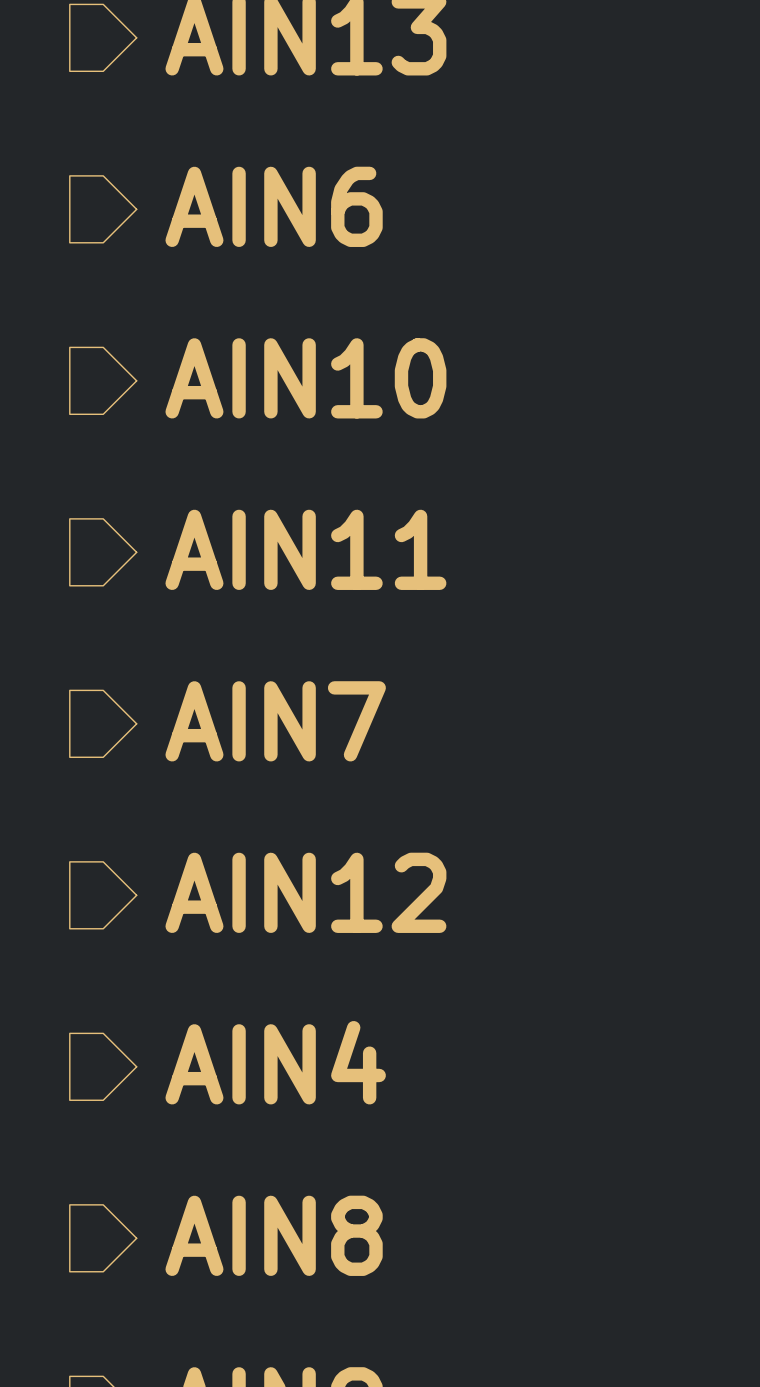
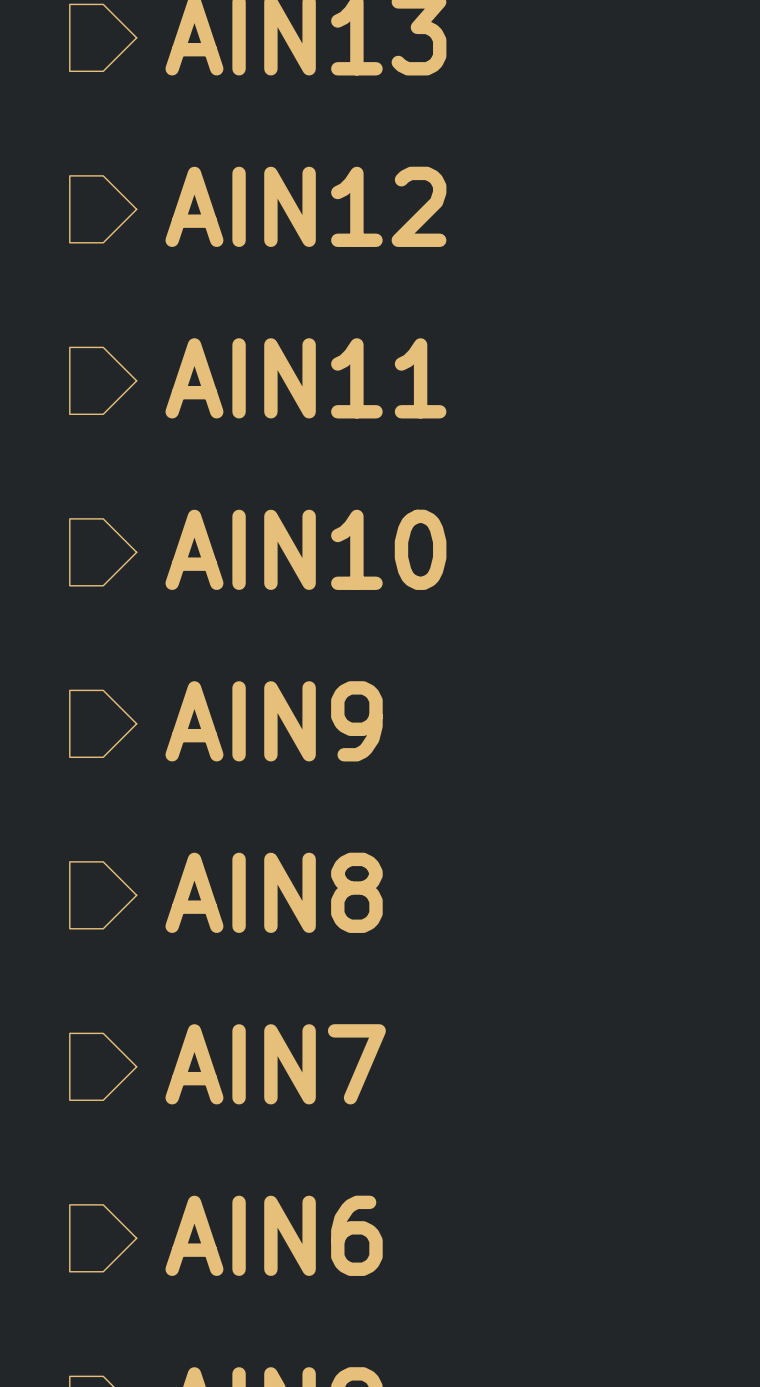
hierarchical label: AIN6 (274, 206) -> AIN12 (305, 206)
hierarchical label: AIN10 (305, 378) -> AIN11 (305, 378)
hierarchical label: AIN11 (305, 549) -> AIN10 (305, 549)
hierarchical label: AIN7 (275, 721) -> AIN9 (274, 721)
hierarchical label: AIN12 (305, 892) -> AIN8 (274, 892)
hierarchical label: AIN4 (275, 1062) -> AIN7 (275, 1064)
hierarchical label: AIN8 (274, 1235) -> AIN6 (274, 1235)

